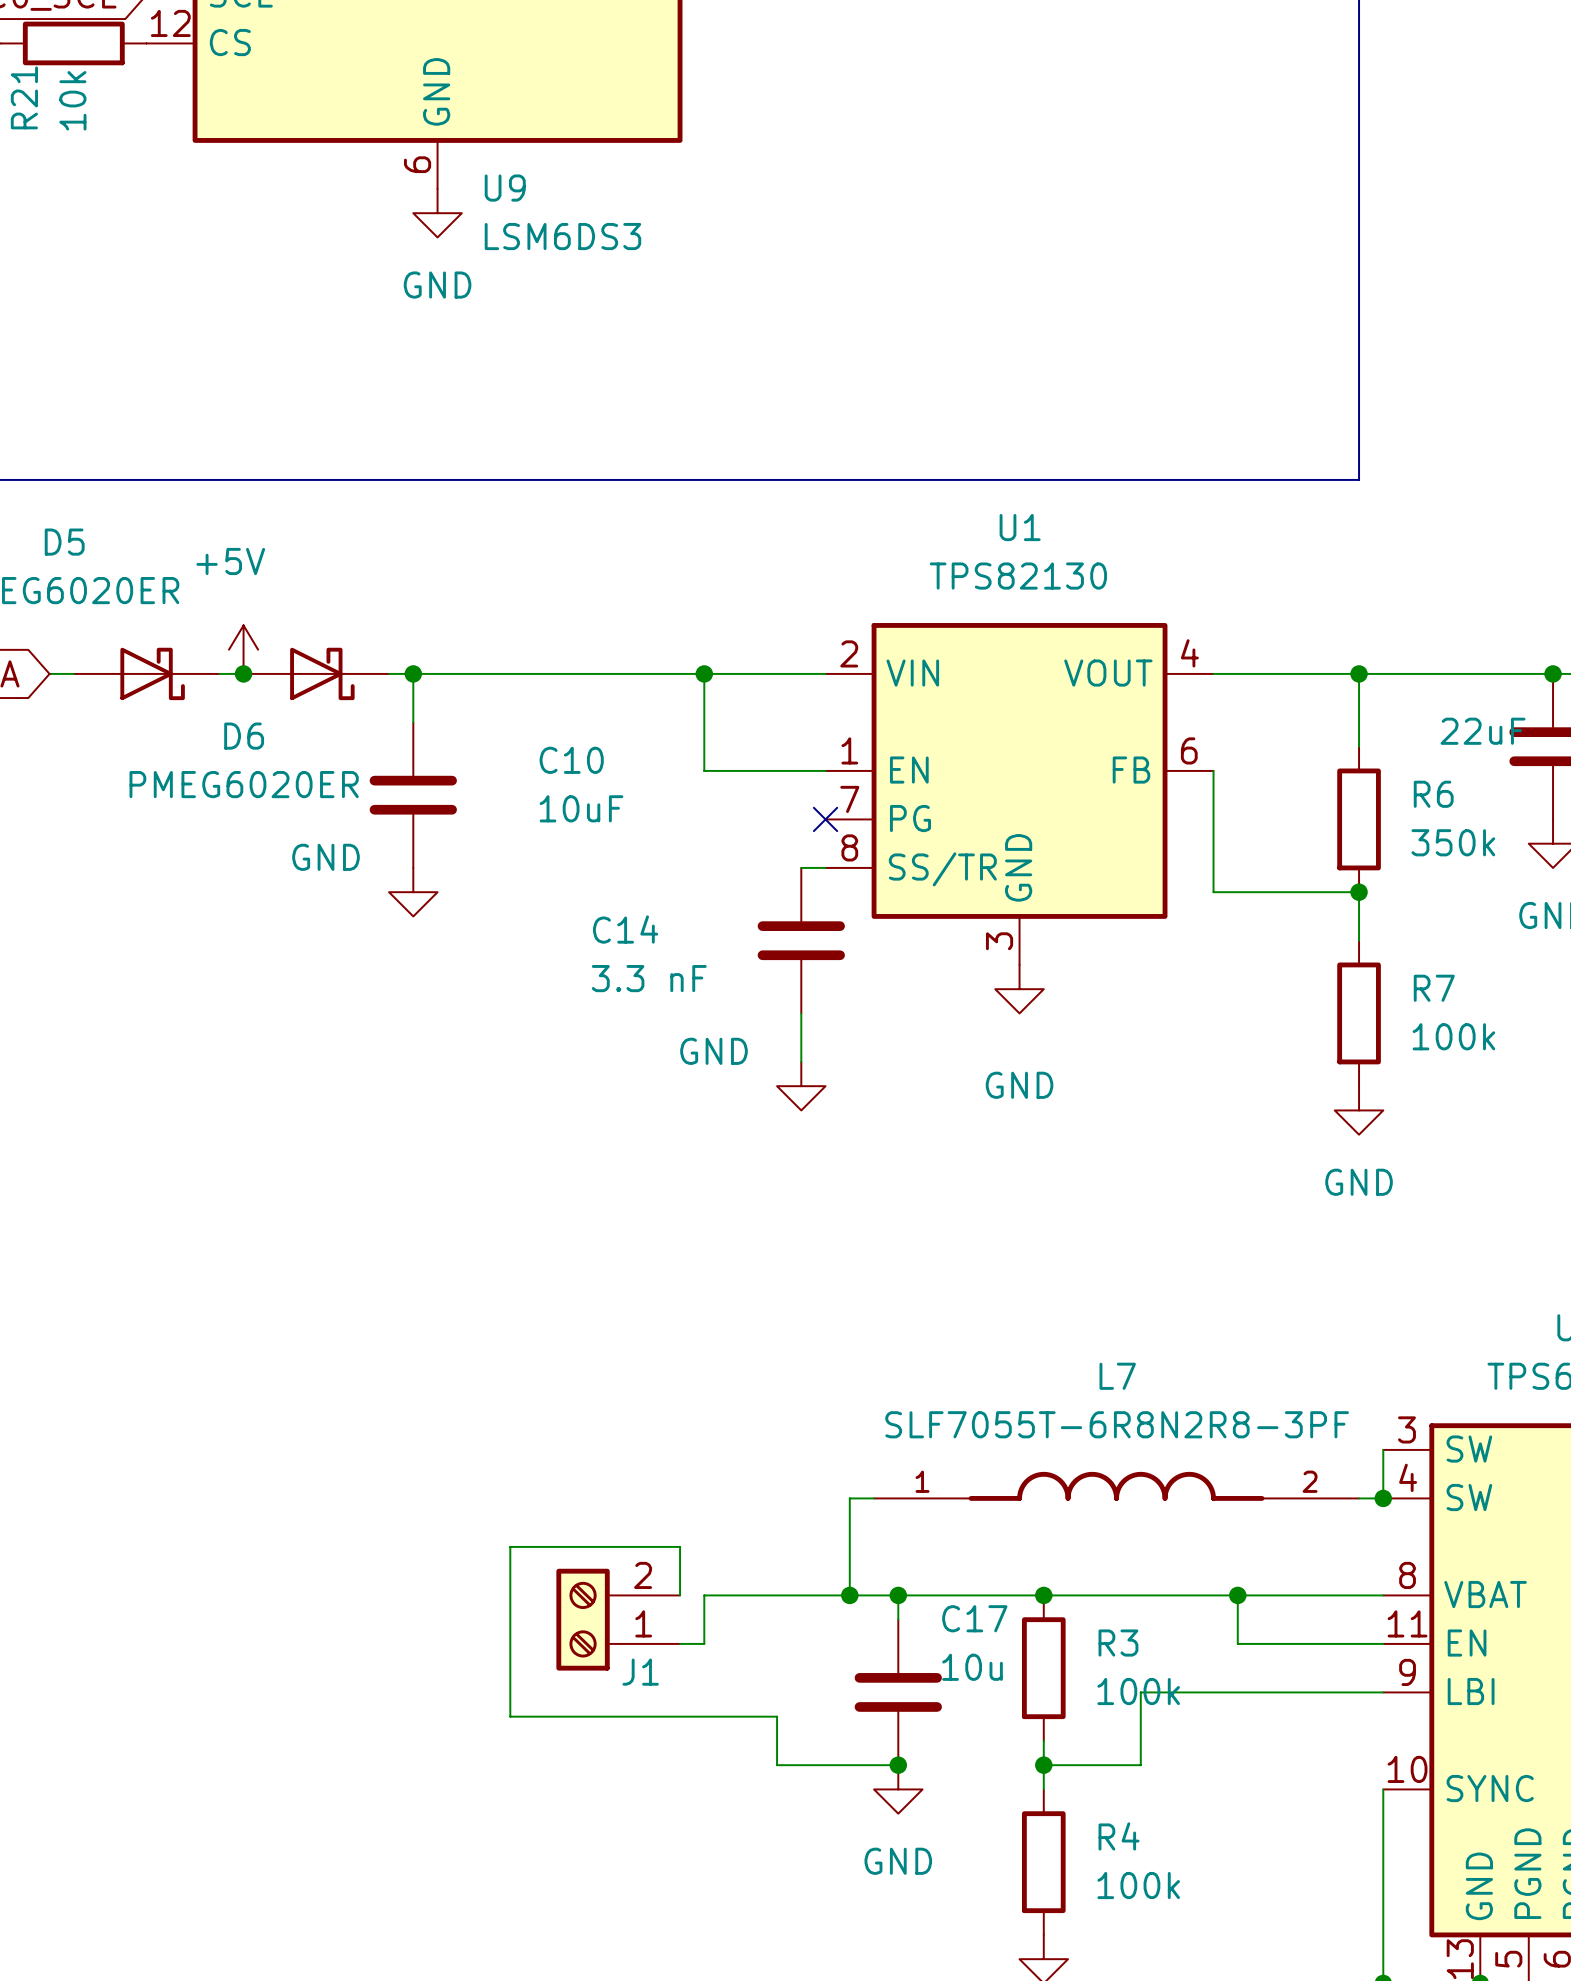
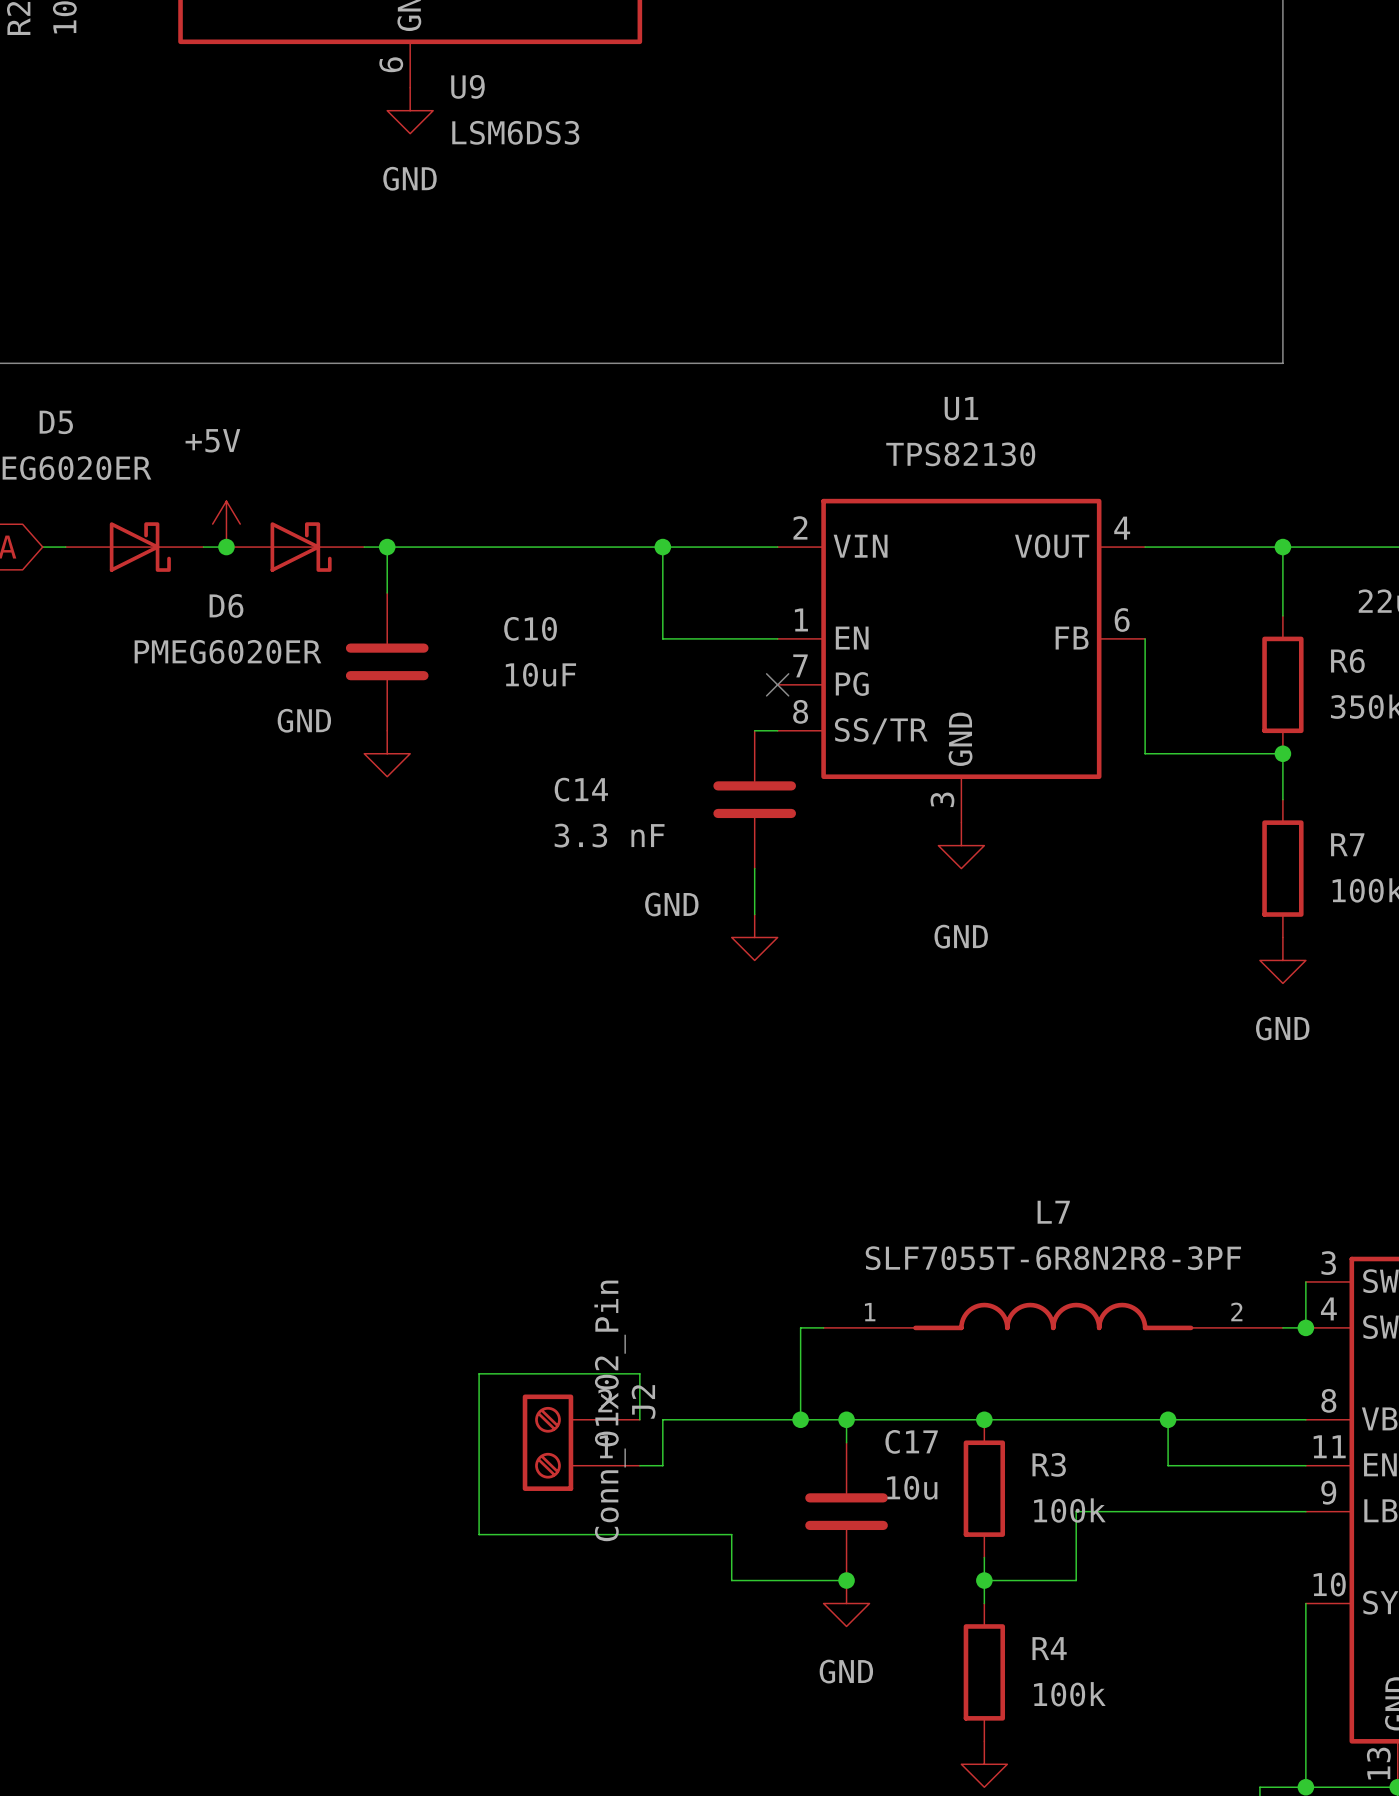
J1 value: none -> Conn_01x02_Pin (610, 1410)
J1 name: J1 (640, 1672) -> J2 (643, 1401)

